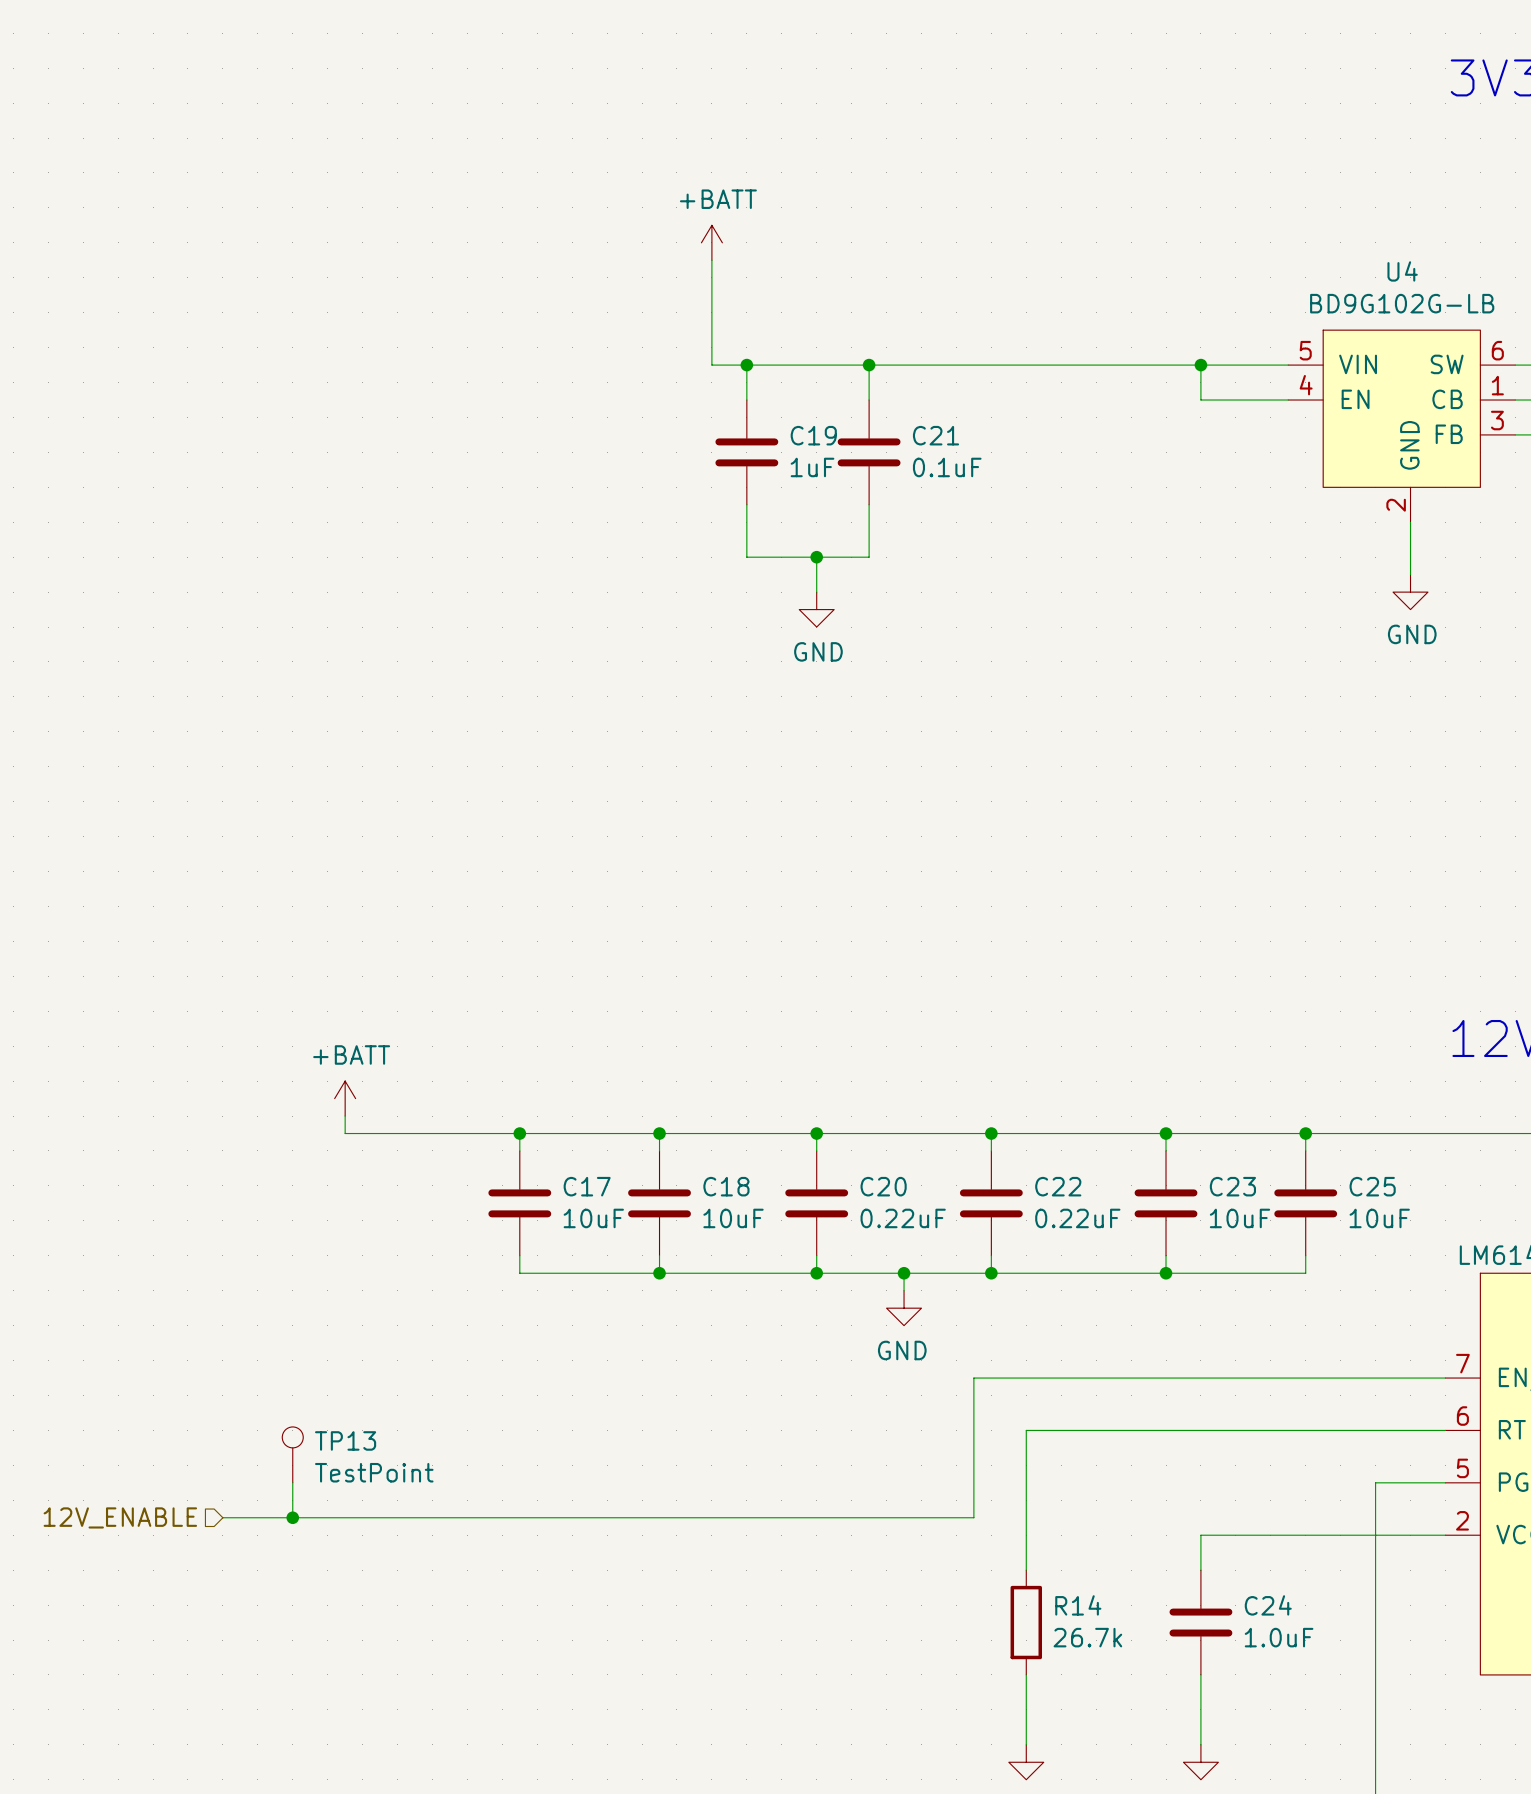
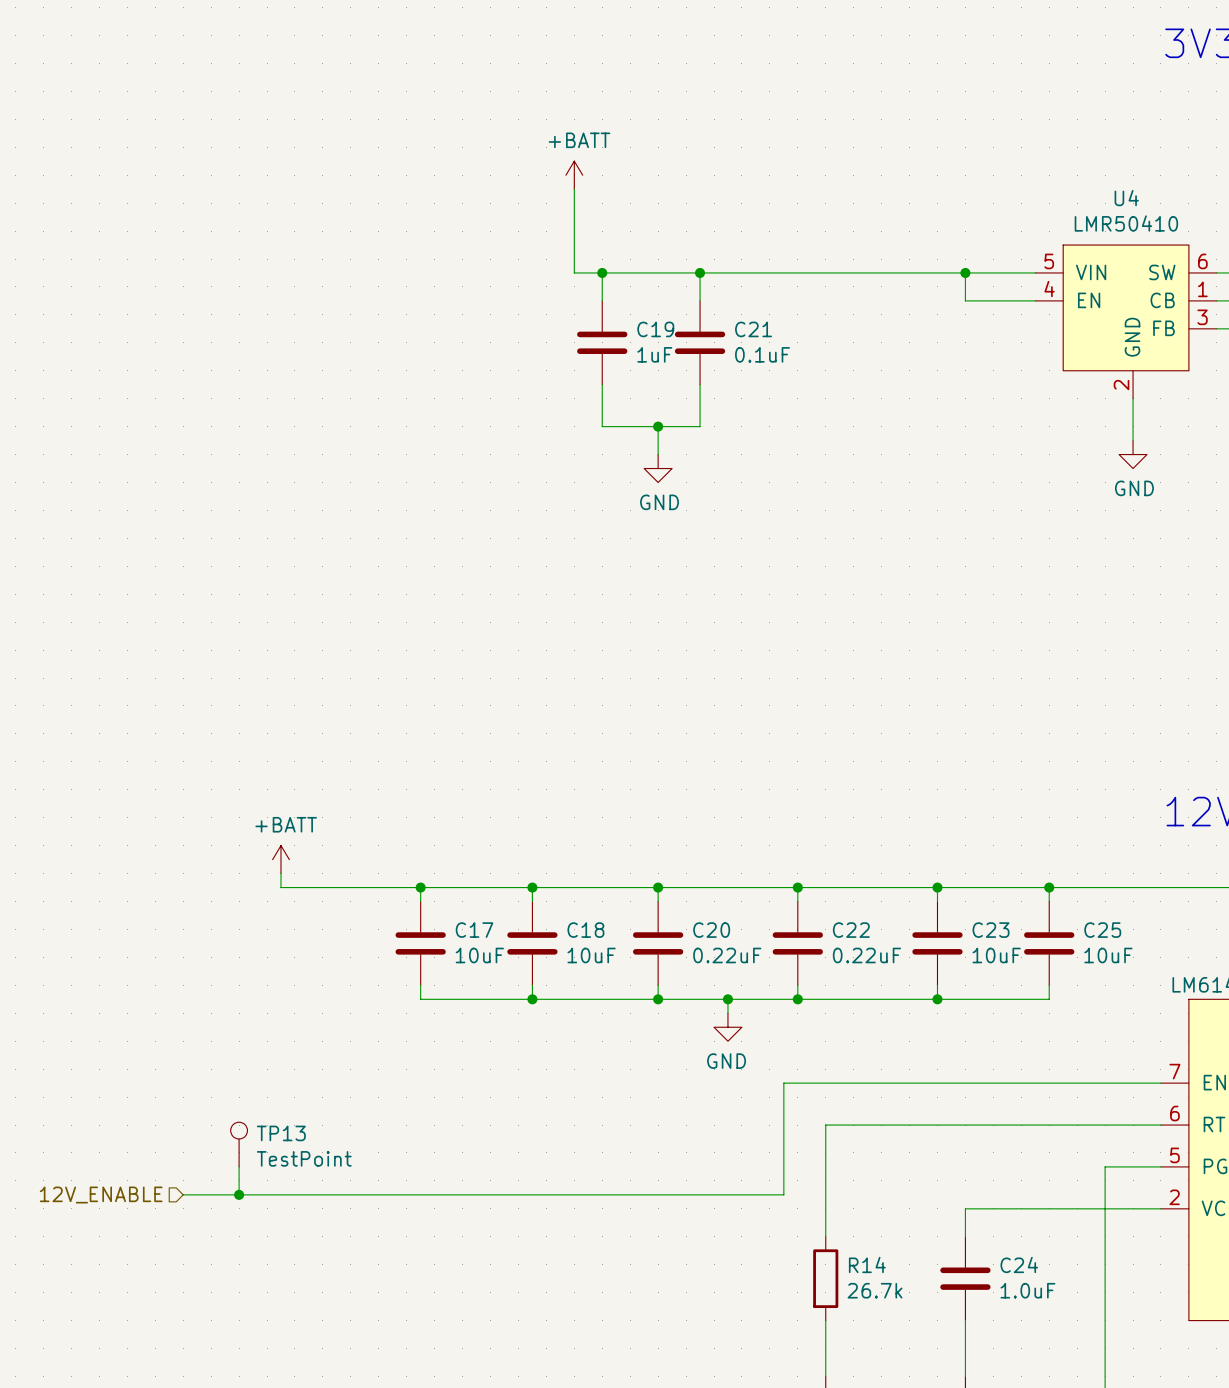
U4 value: BD9G102G-LB (1402, 303) -> LMR50410 (1126, 223)

